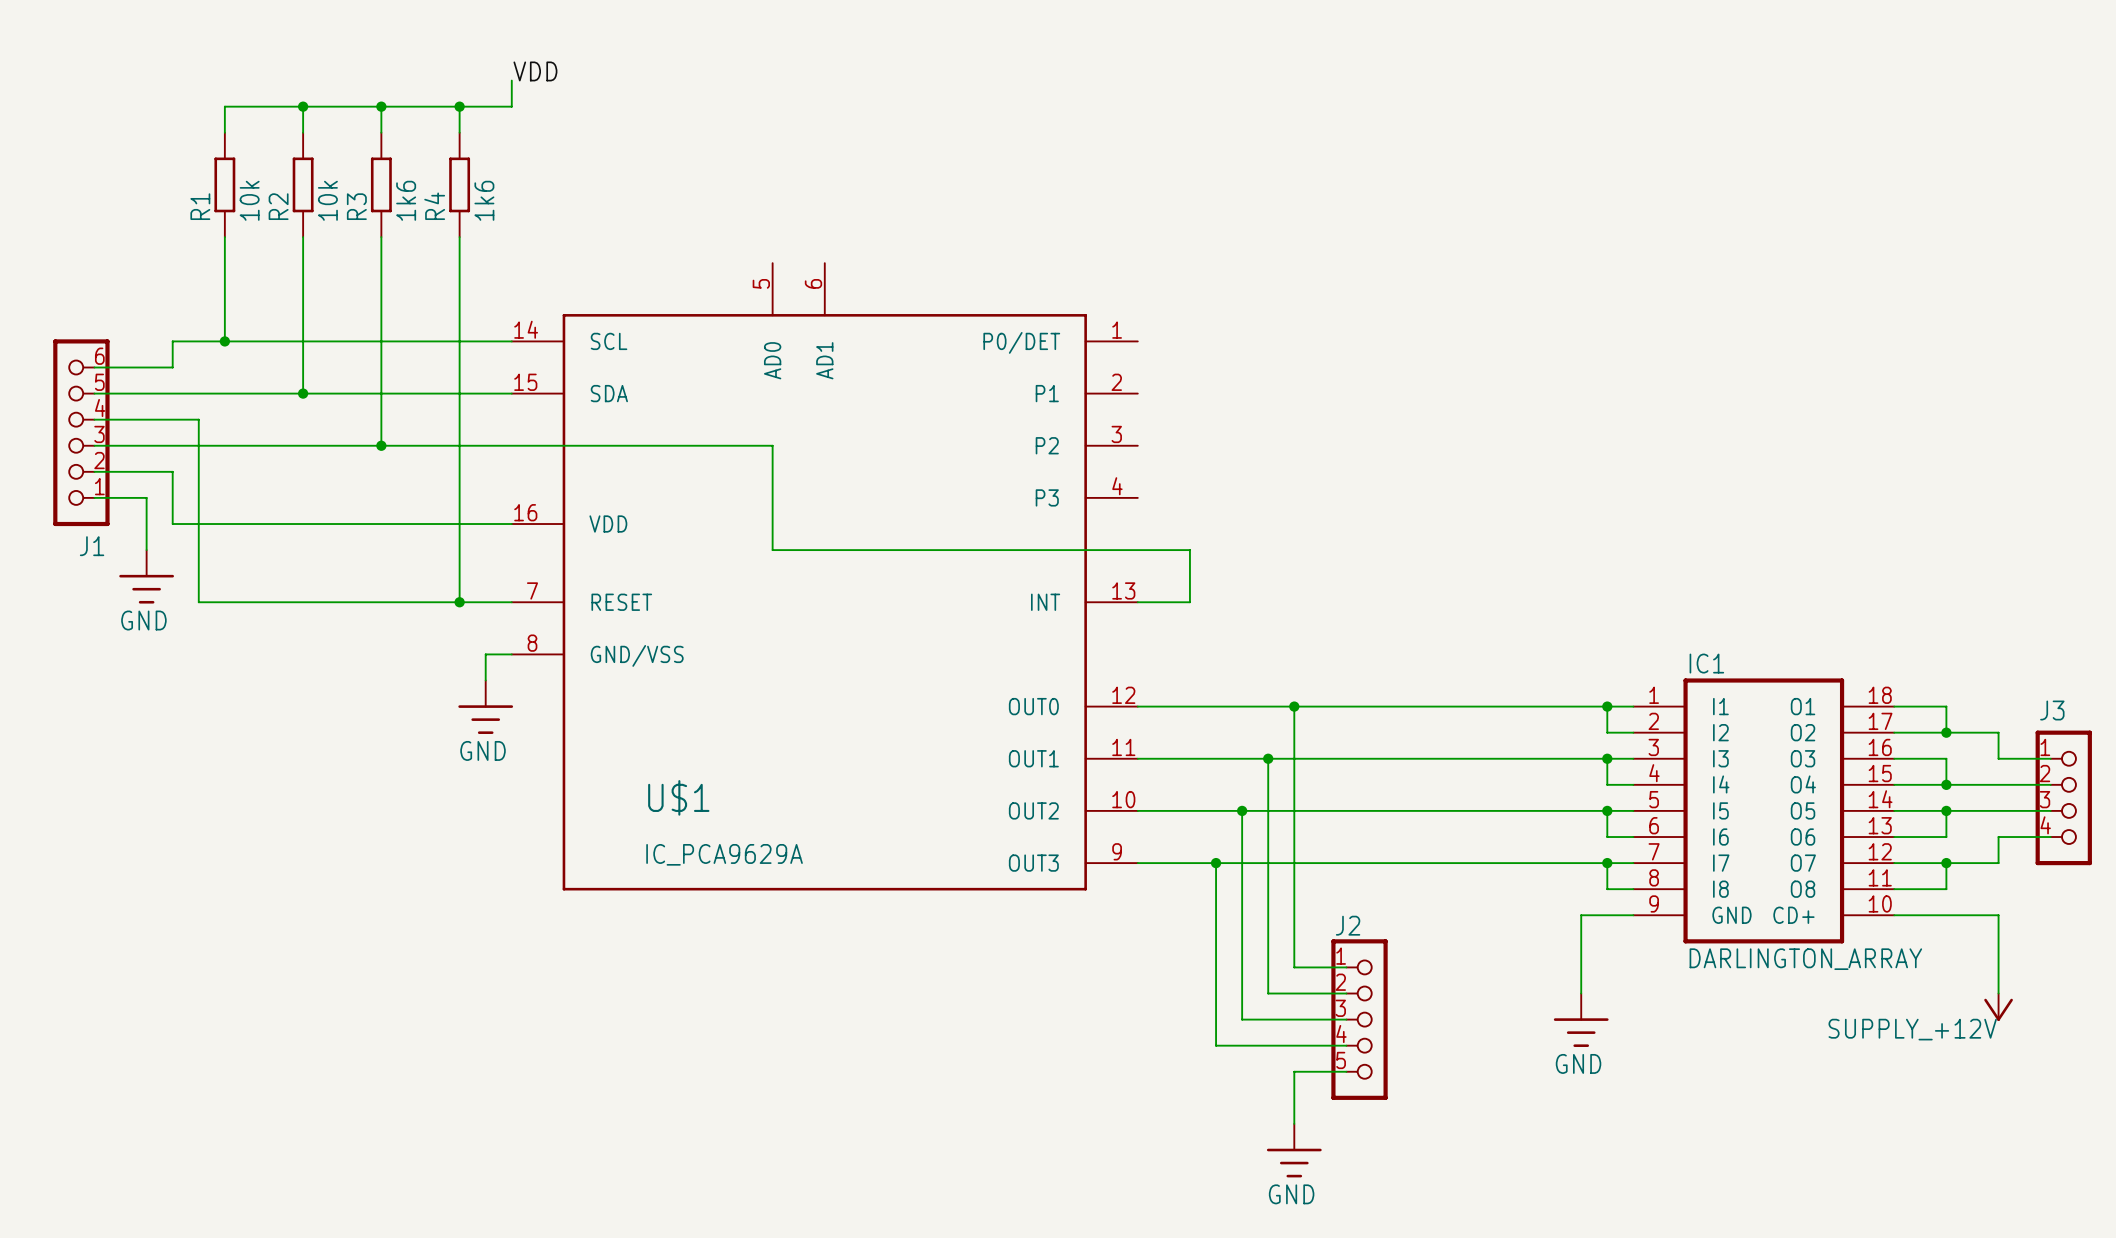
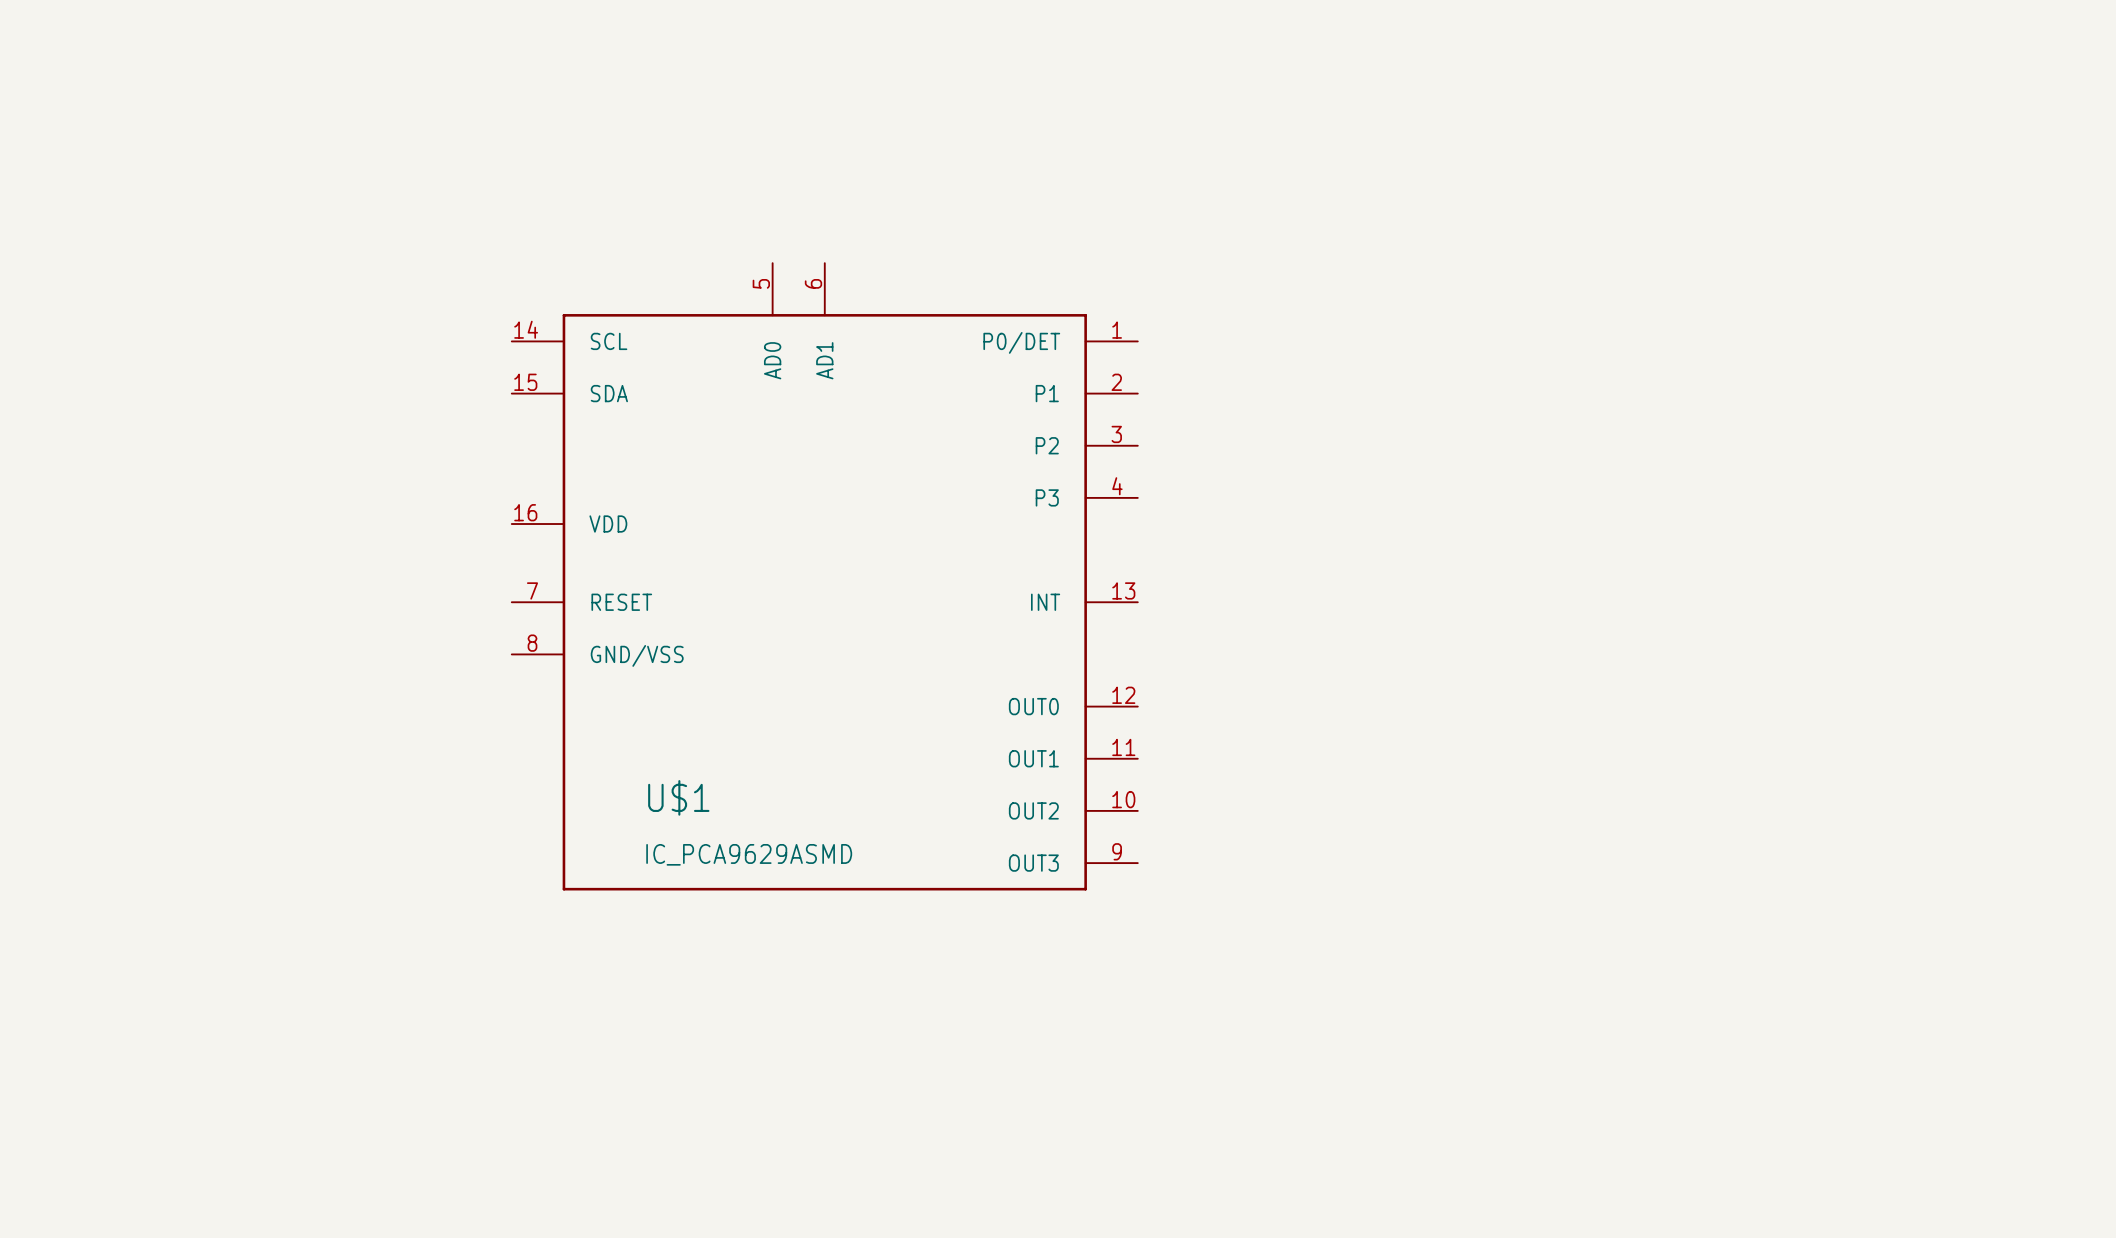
label: VDD (535, 71) -> none
wire: (511, 80) (511, 106) (224, 106) (224, 132) -> none
wire: (303, 106) (303, 132) -> none
junction: (303, 106) -> none
wire: (381, 106) (381, 132) -> none
junction: (381, 106) -> none
wire: (459, 106) (459, 132) -> none
junction: (459, 106) -> none
R1: 10k (224, 184) -> none
R2: 10k (303, 184) -> none
R3: 1k6 (381, 184) -> none
R4: 1k6 (459, 184) -> none
wire: (224, 237) (224, 341) -> none
wire: (303, 237) (303, 393) -> none
wire: (381, 237) (381, 445) -> none
wire: (459, 237) (459, 602) -> none
junction: (224, 341) -> none
wire: (511, 341) (172, 341) (172, 367) (94, 367) -> none
wire: (94, 393) (511, 393) -> none
junction: (303, 393) -> none
wire: (94, 419) (198, 419) (198, 602) (511, 602) -> none
J1: (81, 432) -> none
wire: (94, 445) (772, 445) (772, 550) (1189, 550) (1189, 602) (1137, 602) -> none
junction: (381, 445) -> none
wire: (94, 471) (172, 471) (172, 524) (511, 524) -> none
wire: (94, 497) (146, 497) (146, 550) -> none
power symbol: GND (146, 576) -> none
junction: (459, 602) -> none
wire: (511, 654) (485, 654) (485, 680) -> none
wire: (1137, 706) (1633, 706) -> none
wire: (1294, 706) (1294, 967) (1346, 967) -> none
junction: (1294, 706) -> none
wire: (1607, 706) (1607, 732) (1633, 732) -> none
junction: (1607, 706) -> none
wire: (1894, 706) (1946, 706) (1946, 732) -> none
power symbol: GND (485, 707) -> none
wire: (1894, 732) (1998, 732) (1998, 758) (2050, 758) -> none
junction: (1946, 732) -> none
wire: (1137, 758) (1633, 758) -> none
wire: (1268, 758) (1268, 993) (1346, 993) -> none
junction: (1268, 758) -> none
wire: (1607, 758) (1607, 784) (1633, 784) -> none
junction: (1607, 758) -> none
wire: (1894, 758) (1946, 758) (1946, 784) -> none
wire: (1894, 784) (2050, 784) -> none
junction: (1946, 784) -> none
J3: (2063, 797) -> none
wire: (1137, 810) (1633, 810) -> none
wire: (1242, 810) (1242, 1019) (1346, 1019) -> none
junction: (1242, 810) -> none
wire: (1607, 810) (1607, 837) (1633, 837) -> none
junction: (1607, 810) -> none
IC1: DARLINGTON_ARRAY (1763, 810) -> none
wire: (1894, 810) (2050, 810) -> none
wire: (1946, 810) (1946, 837) (1894, 837) -> none
junction: (1946, 810) -> none
wire: (2050, 837) (1998, 837) (1998, 863) (1894, 863) -> none
U$1 value: IC_PCA9629A (724, 854) -> IC_PCA9629ASMD (749, 854)
wire: (1137, 863) (1633, 863) -> none
wire: (1216, 863) (1216, 1045) (1346, 1045) -> none
junction: (1216, 863) -> none
wire: (1607, 863) (1607, 889) (1633, 889) -> none
junction: (1607, 863) -> none
wire: (1946, 863) (1946, 889) (1894, 889) -> none
junction: (1946, 863) -> none
wire: (1633, 915) (1581, 915) (1581, 993) -> none
wire: (1894, 915) (1998, 915) (1998, 993) -> none
power symbol: SUPPLY_+12V (1998, 1007) -> none
J2: (1359, 1019) -> none
power symbol: GND (1581, 1020) -> none
wire: (1346, 1071) (1294, 1071) (1294, 1123) -> none
power symbol: GND (1294, 1150) -> none

